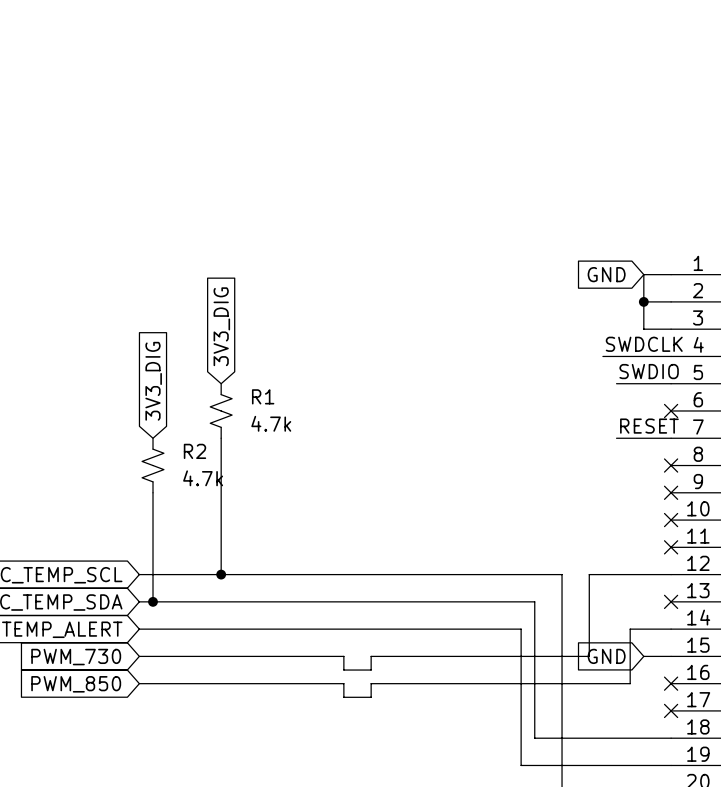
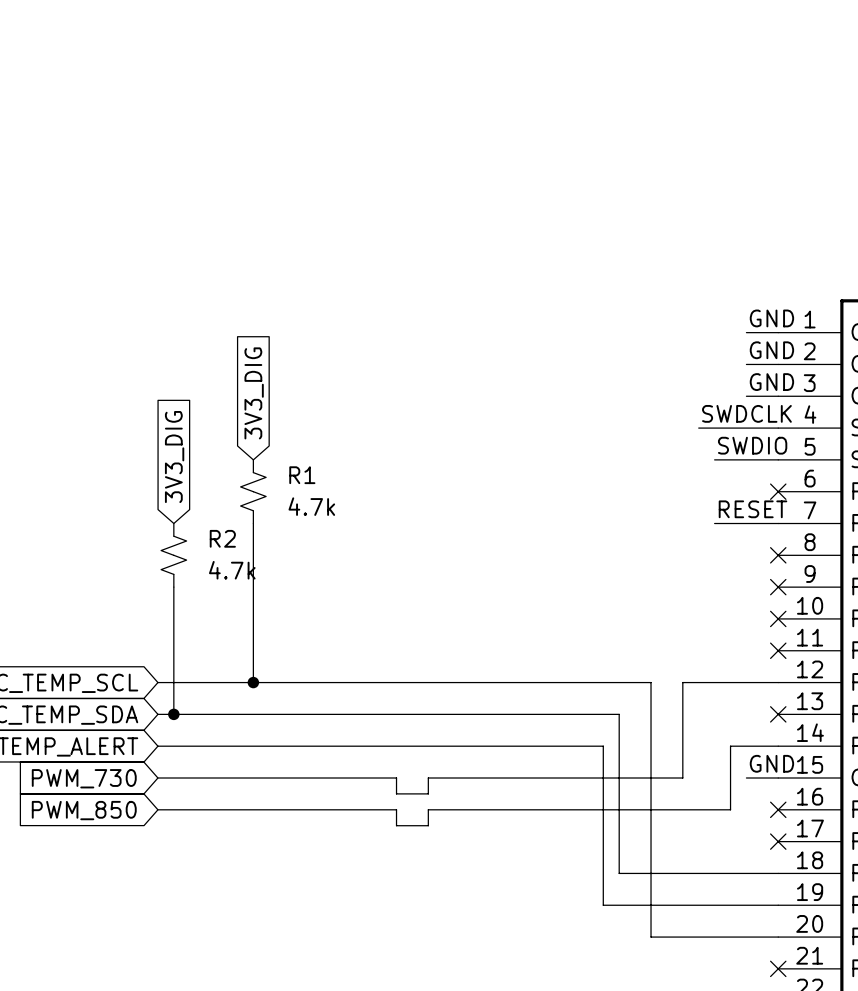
label: none -> GND (771, 318)
global label: GND (606, 274) -> none
wire: (643, 274) (643, 329) -> none
label: none -> GND (771, 350)
junction: (643, 301) -> none
label: none -> GND (771, 382)
label: none -> GND (771, 763)
global label: GND (606, 656) -> none

